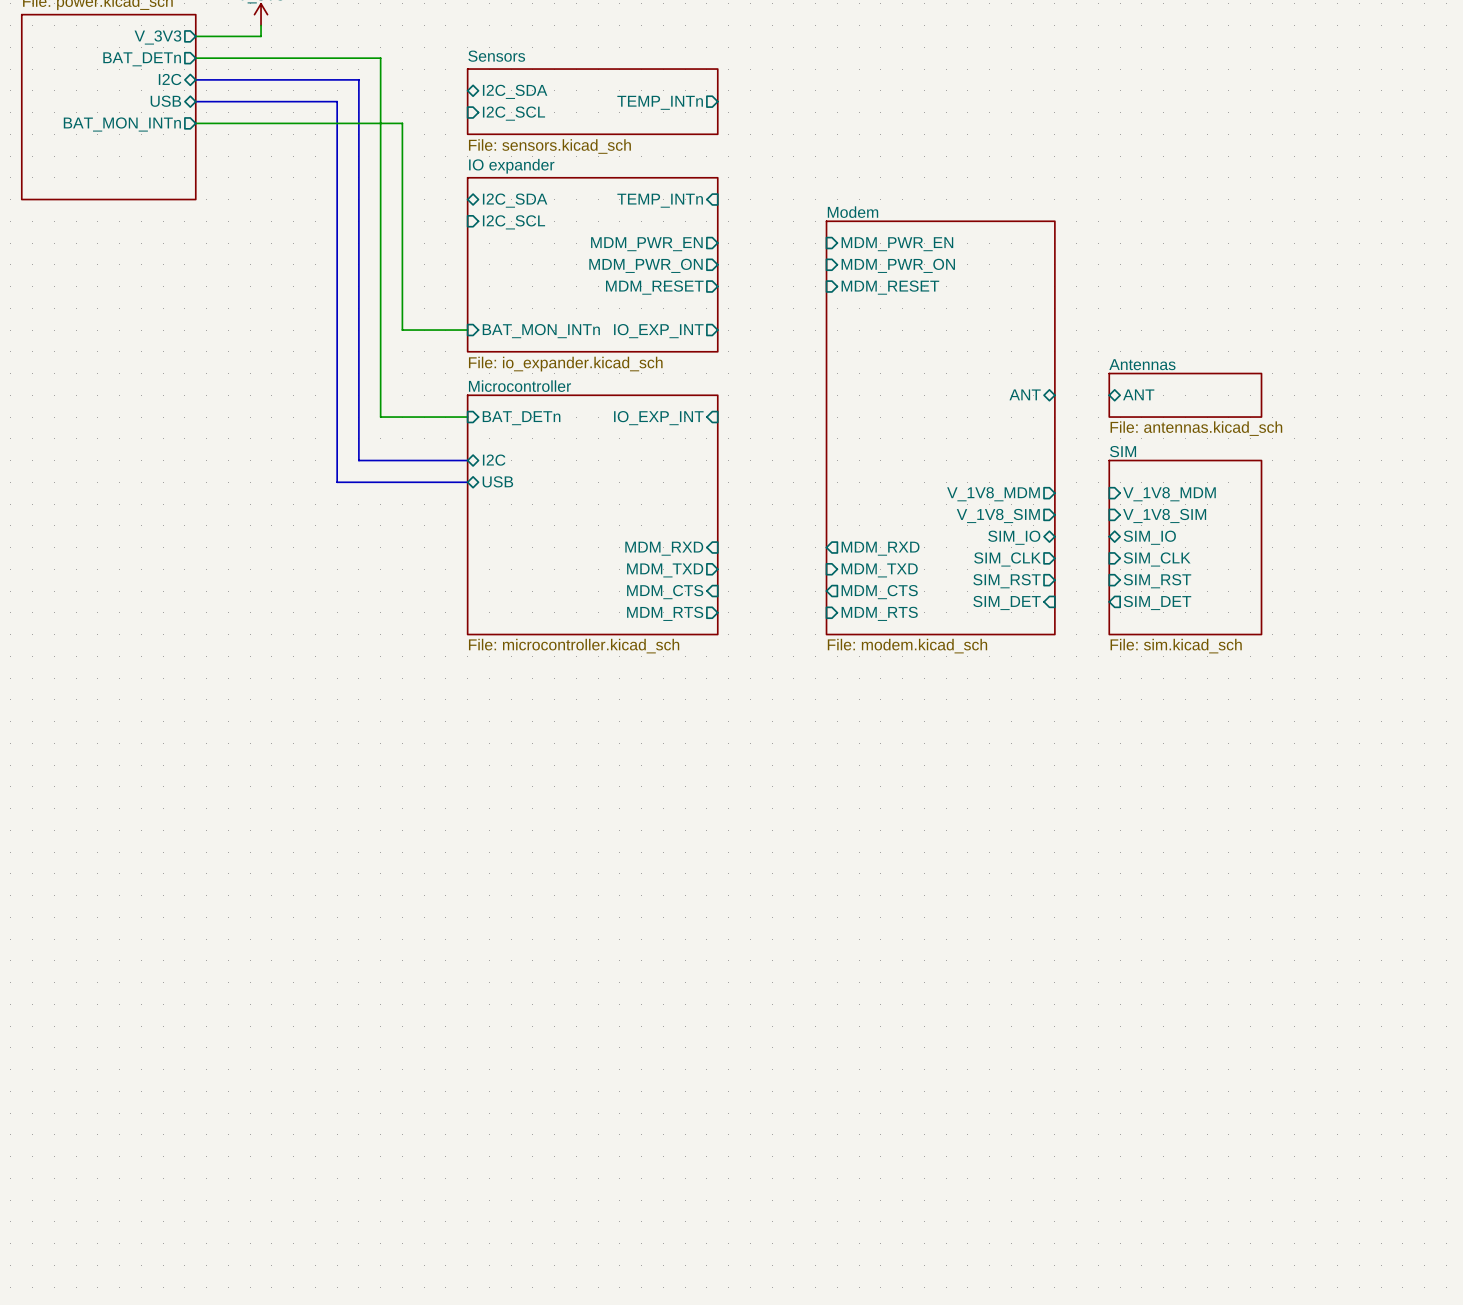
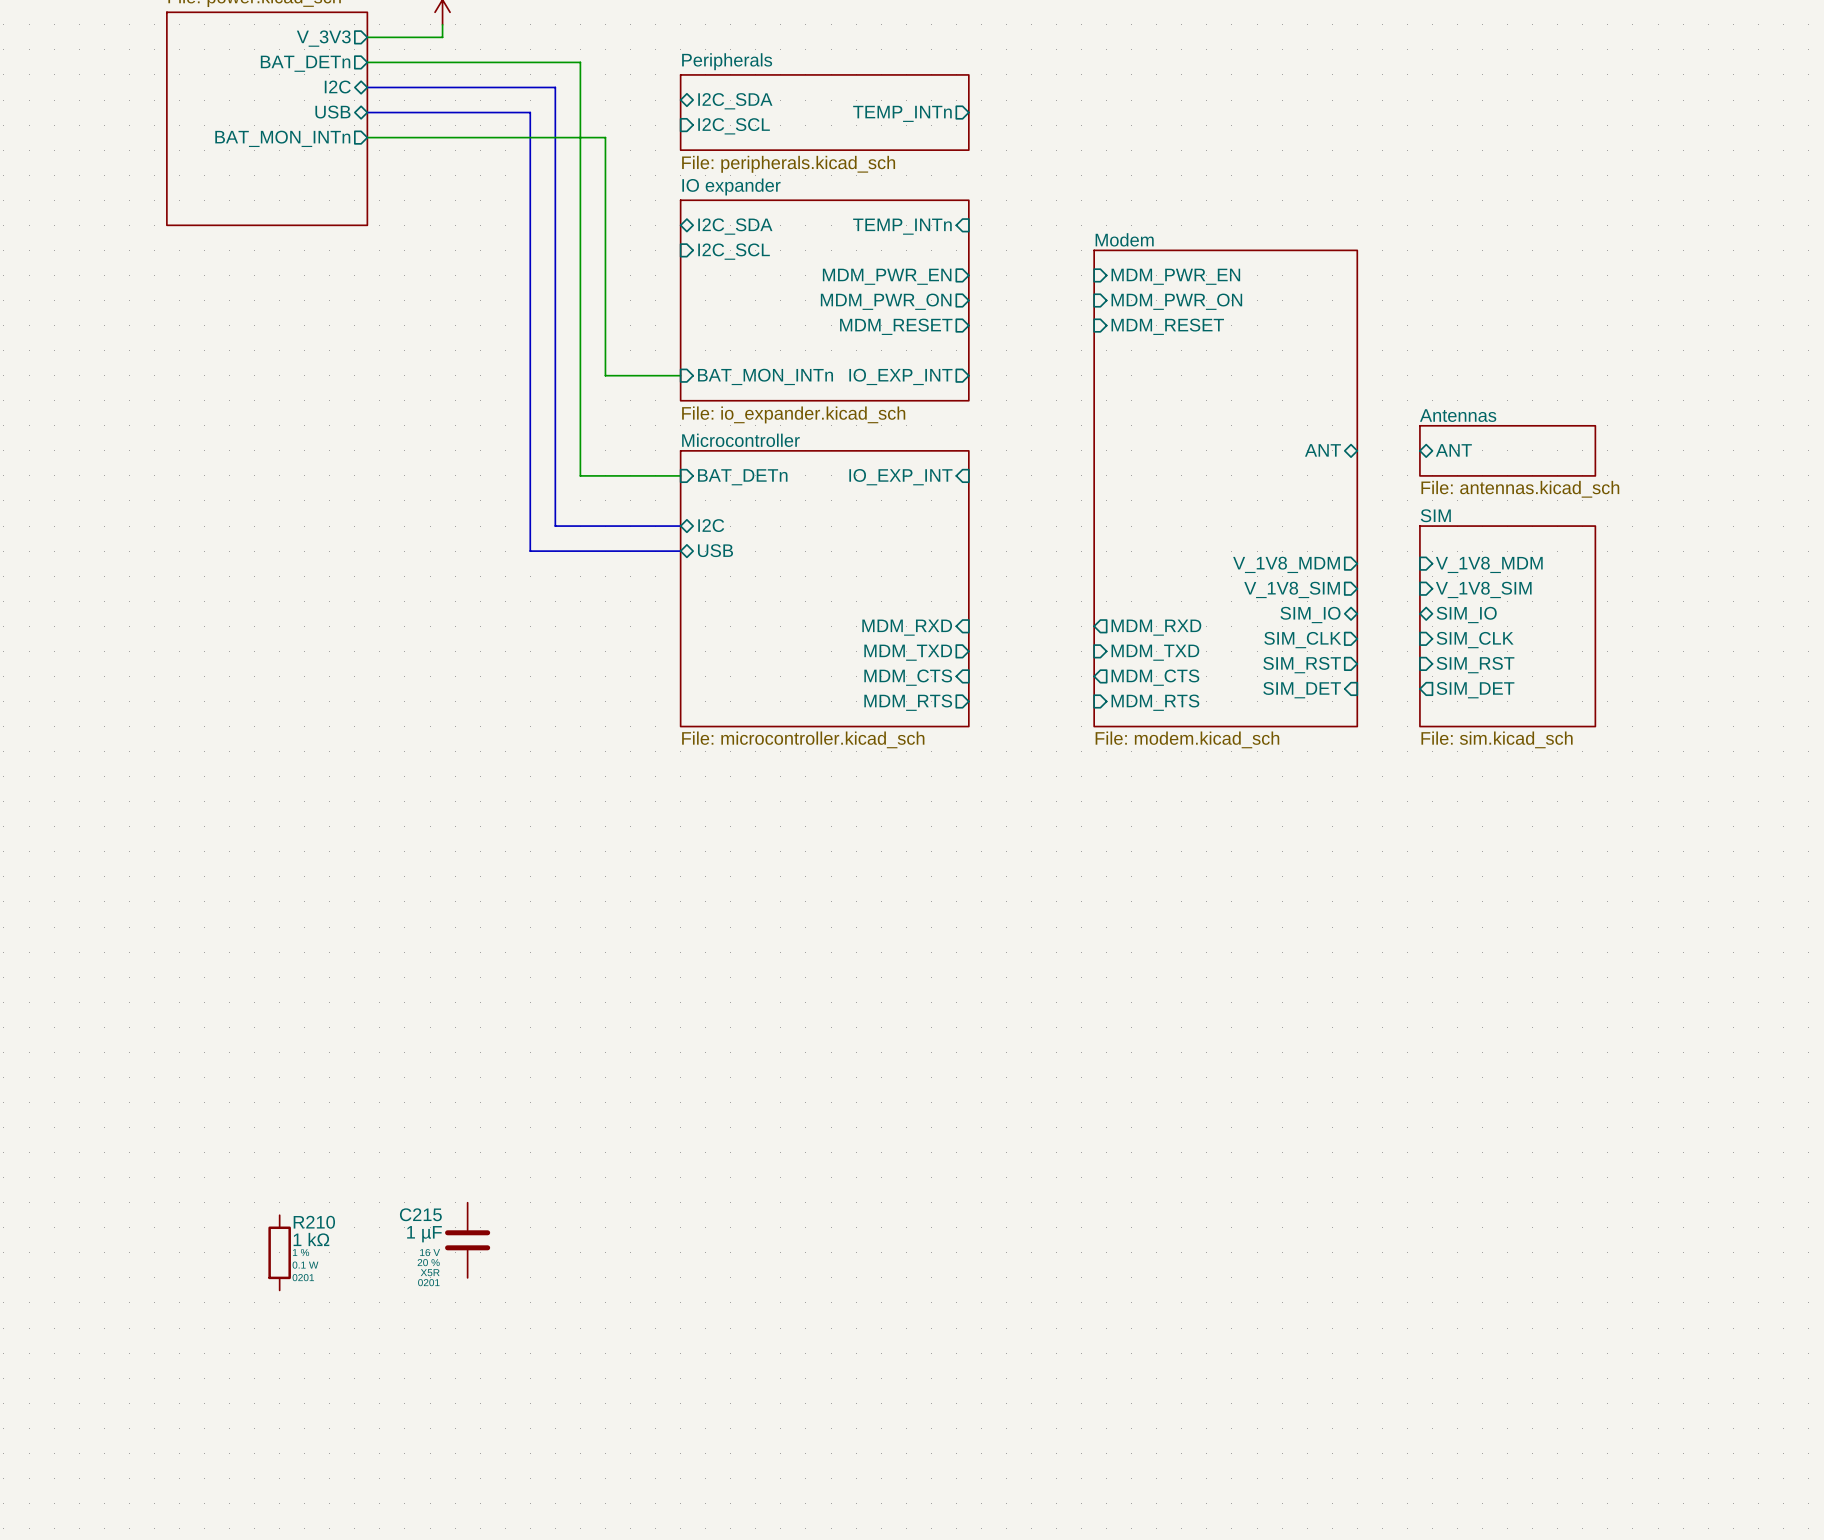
sheet Sensors name: Sensors (496, 56) -> Peripherals (727, 61)
sheet Sensors value: File: sensors.kicad_sch (549, 146) -> File: peripherals.kicad_sch (788, 164)
C215: none -> 1 µF (467, 1240)
R210: none -> 1 kΩ (279, 1252)

